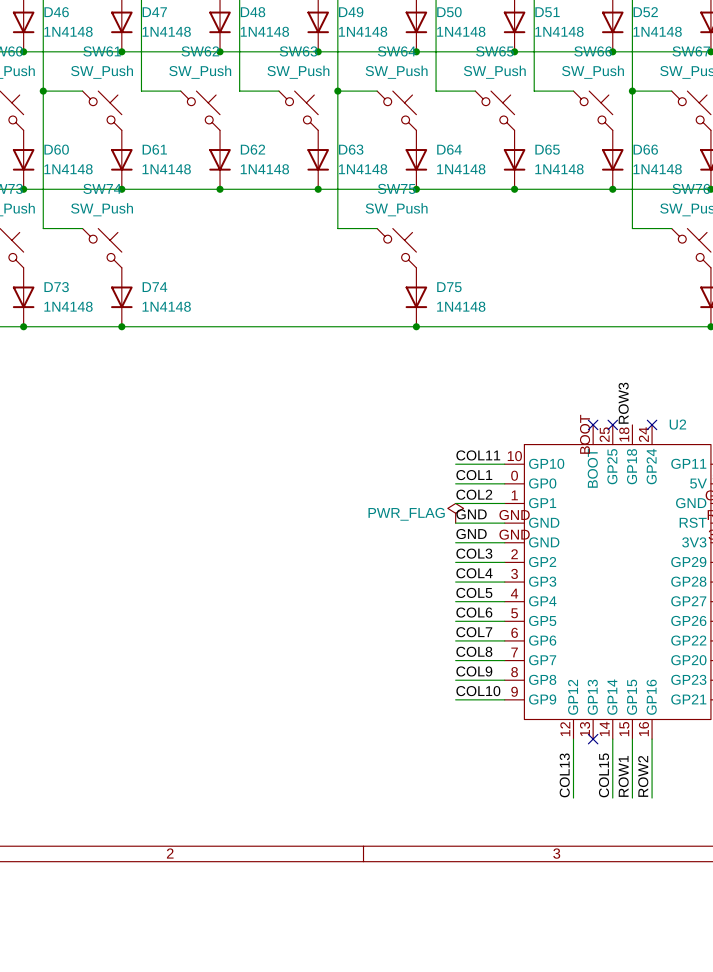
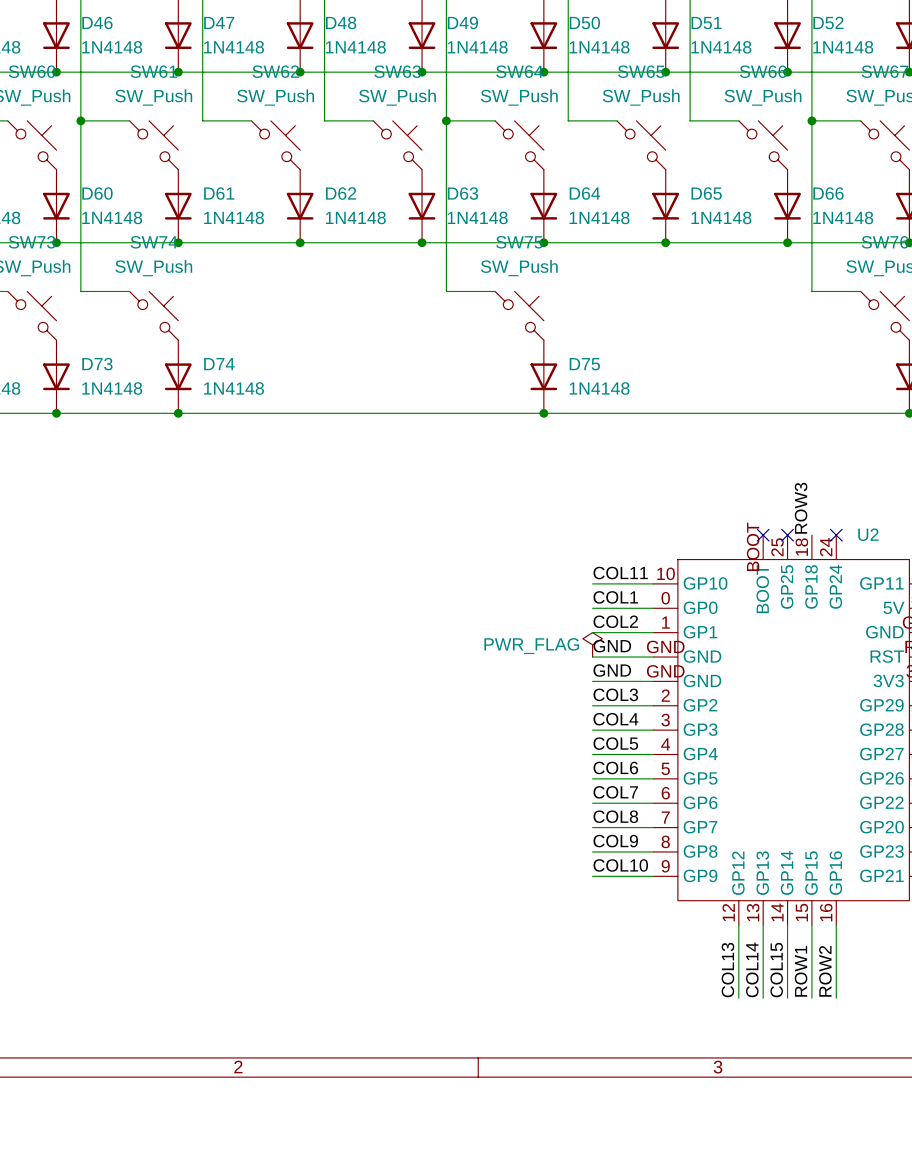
wire: none -> (763, 925) (763, 998)
no-connect mark: (593, 739) -> none
label: none -> COL14 (752, 969)

